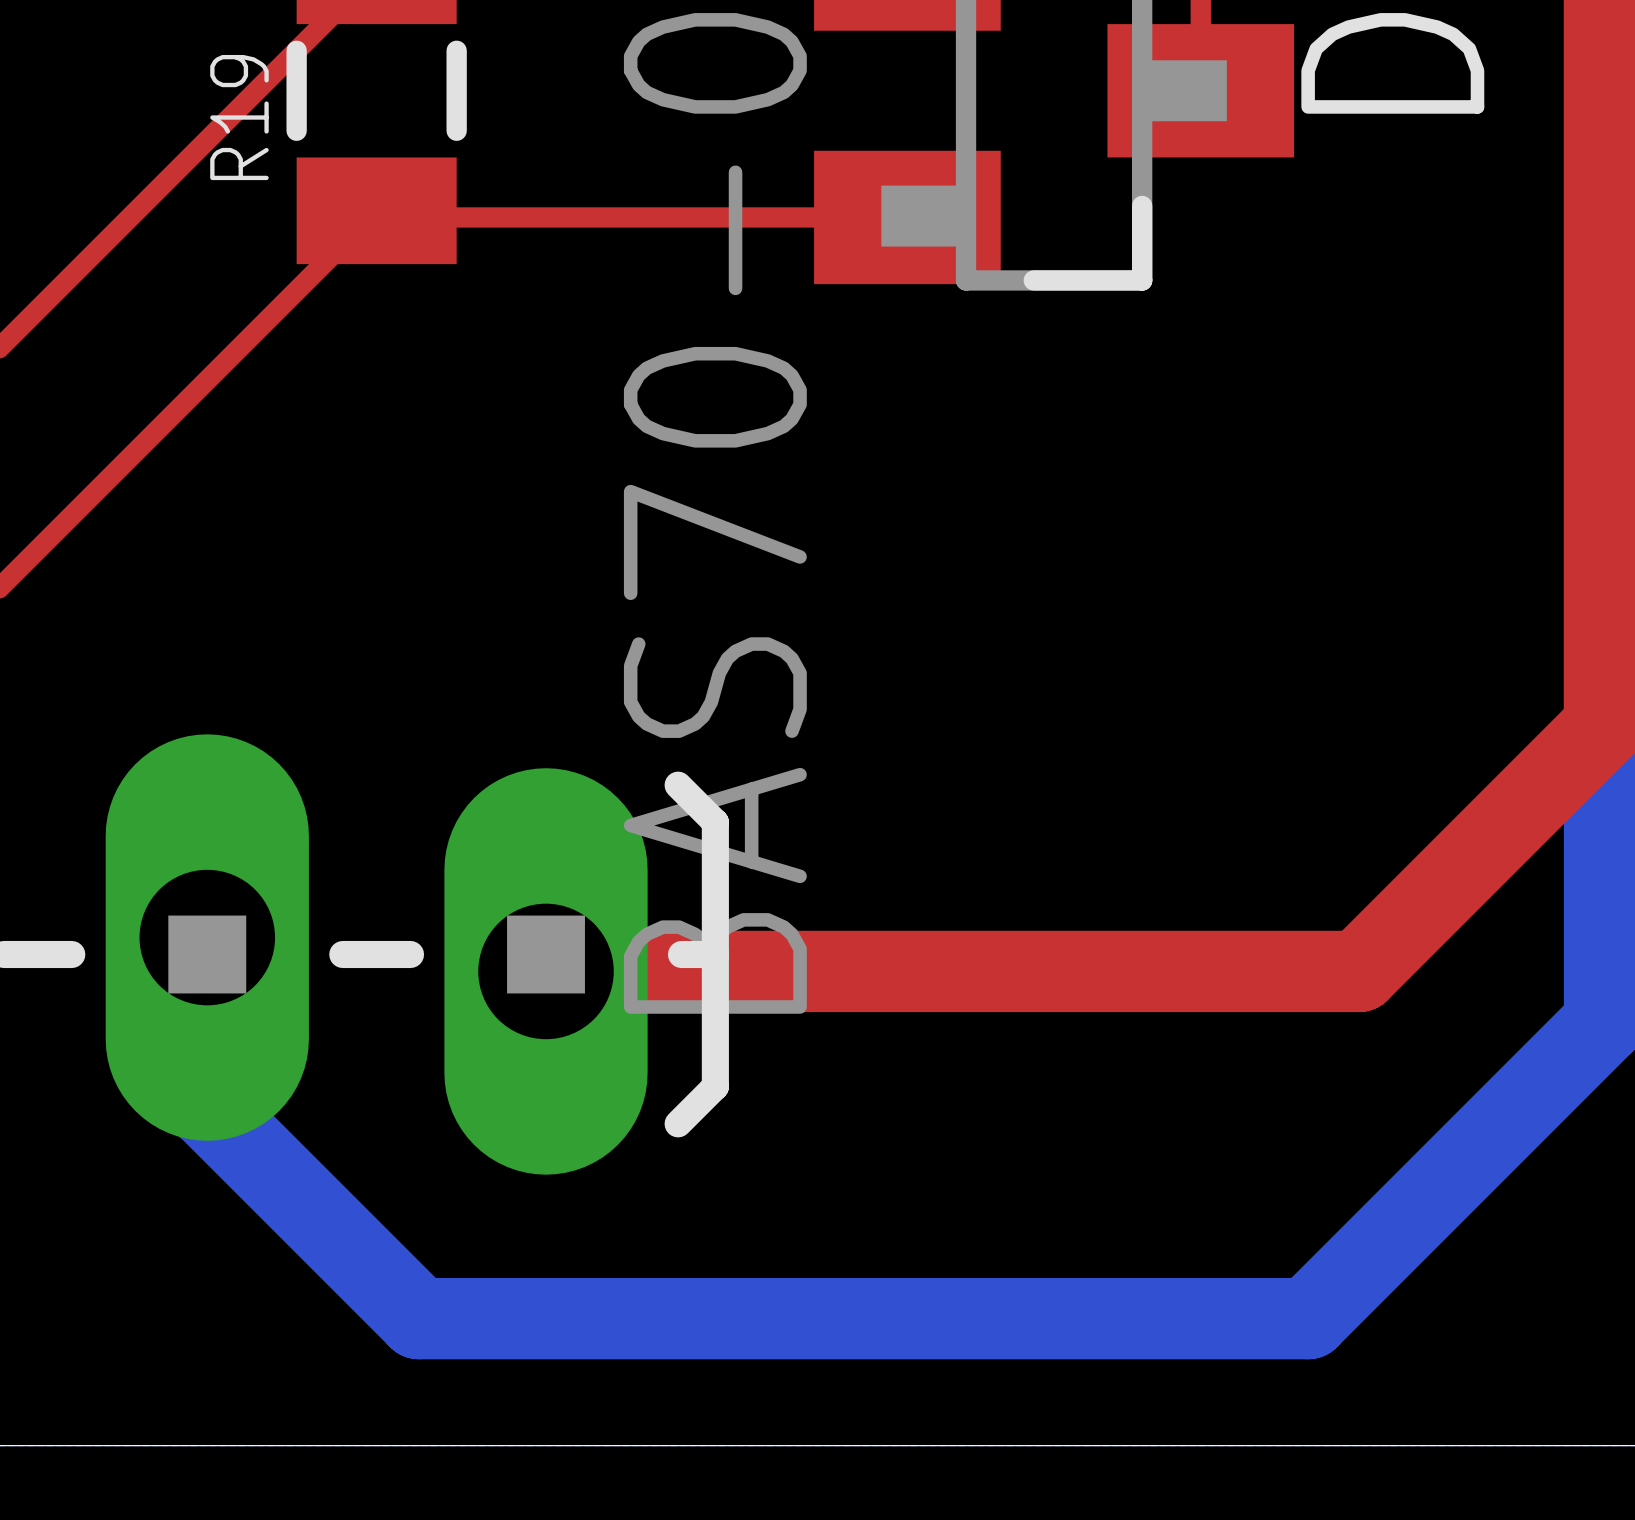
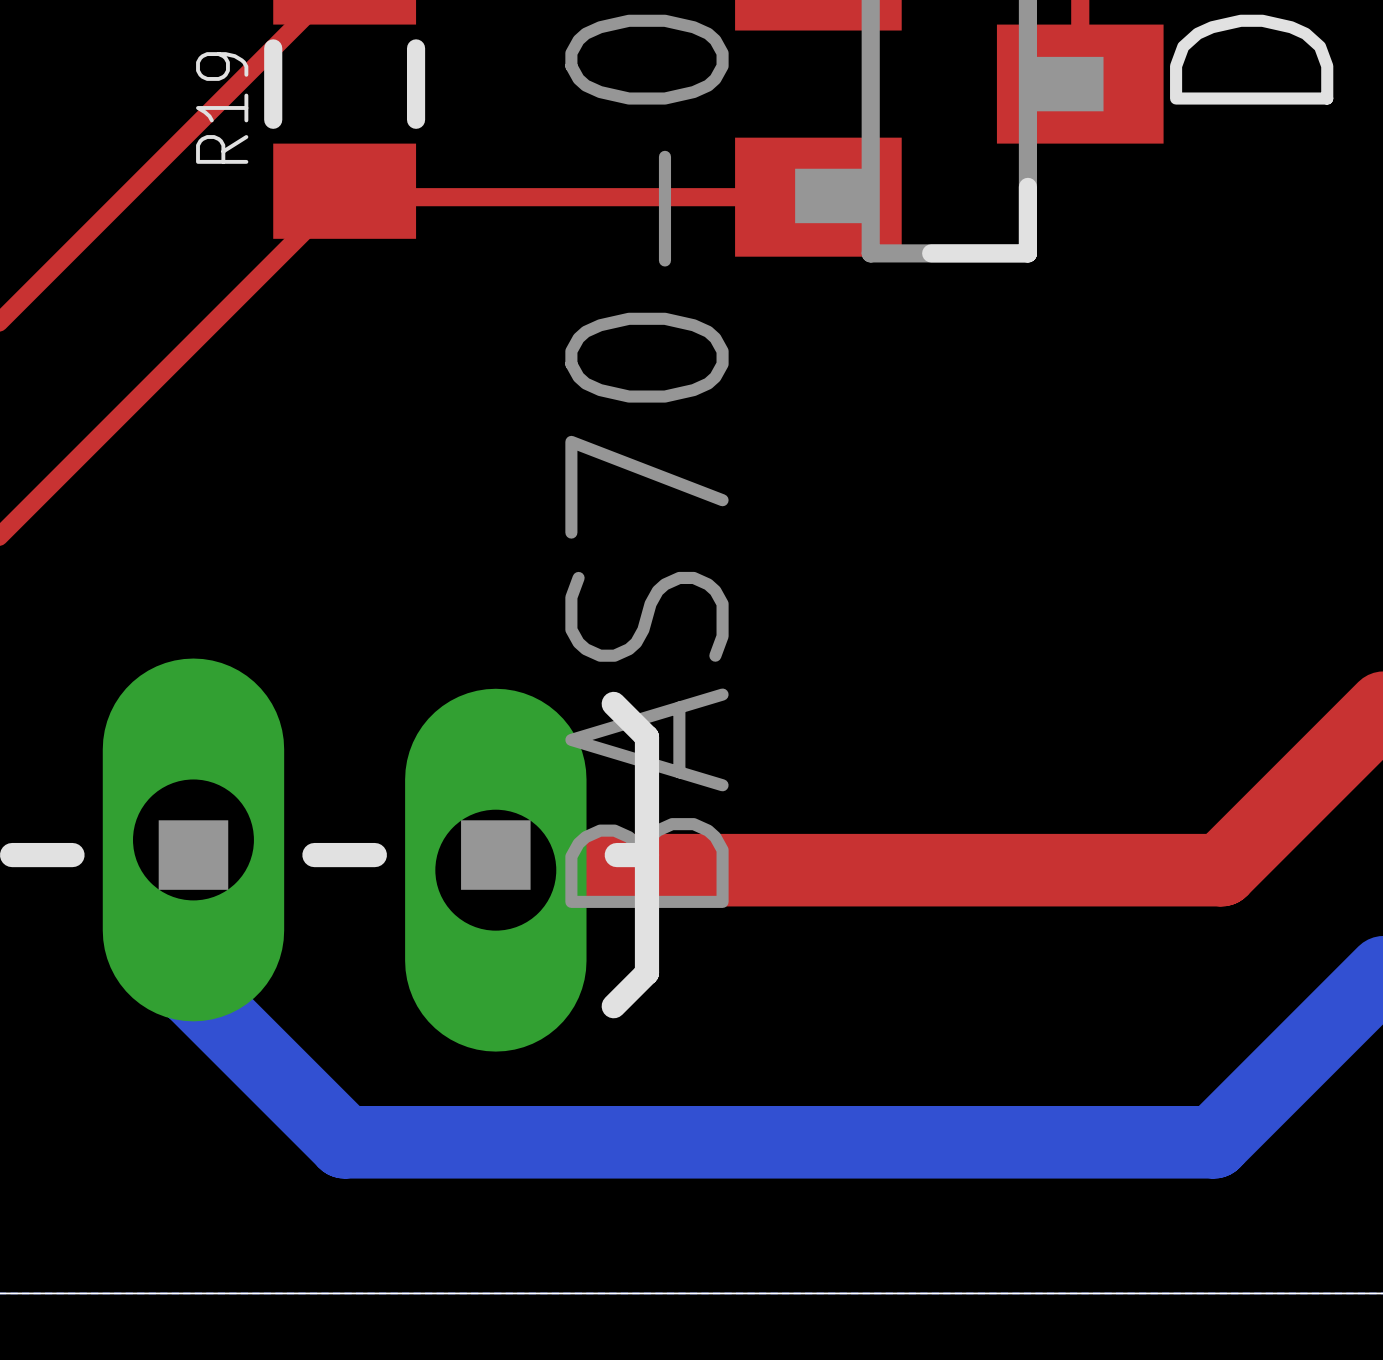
bottom track: (376, 1276) (418, 1318) (1308, 1318) (1350, 1276) -> (344, 1142) (1213, 1142)

